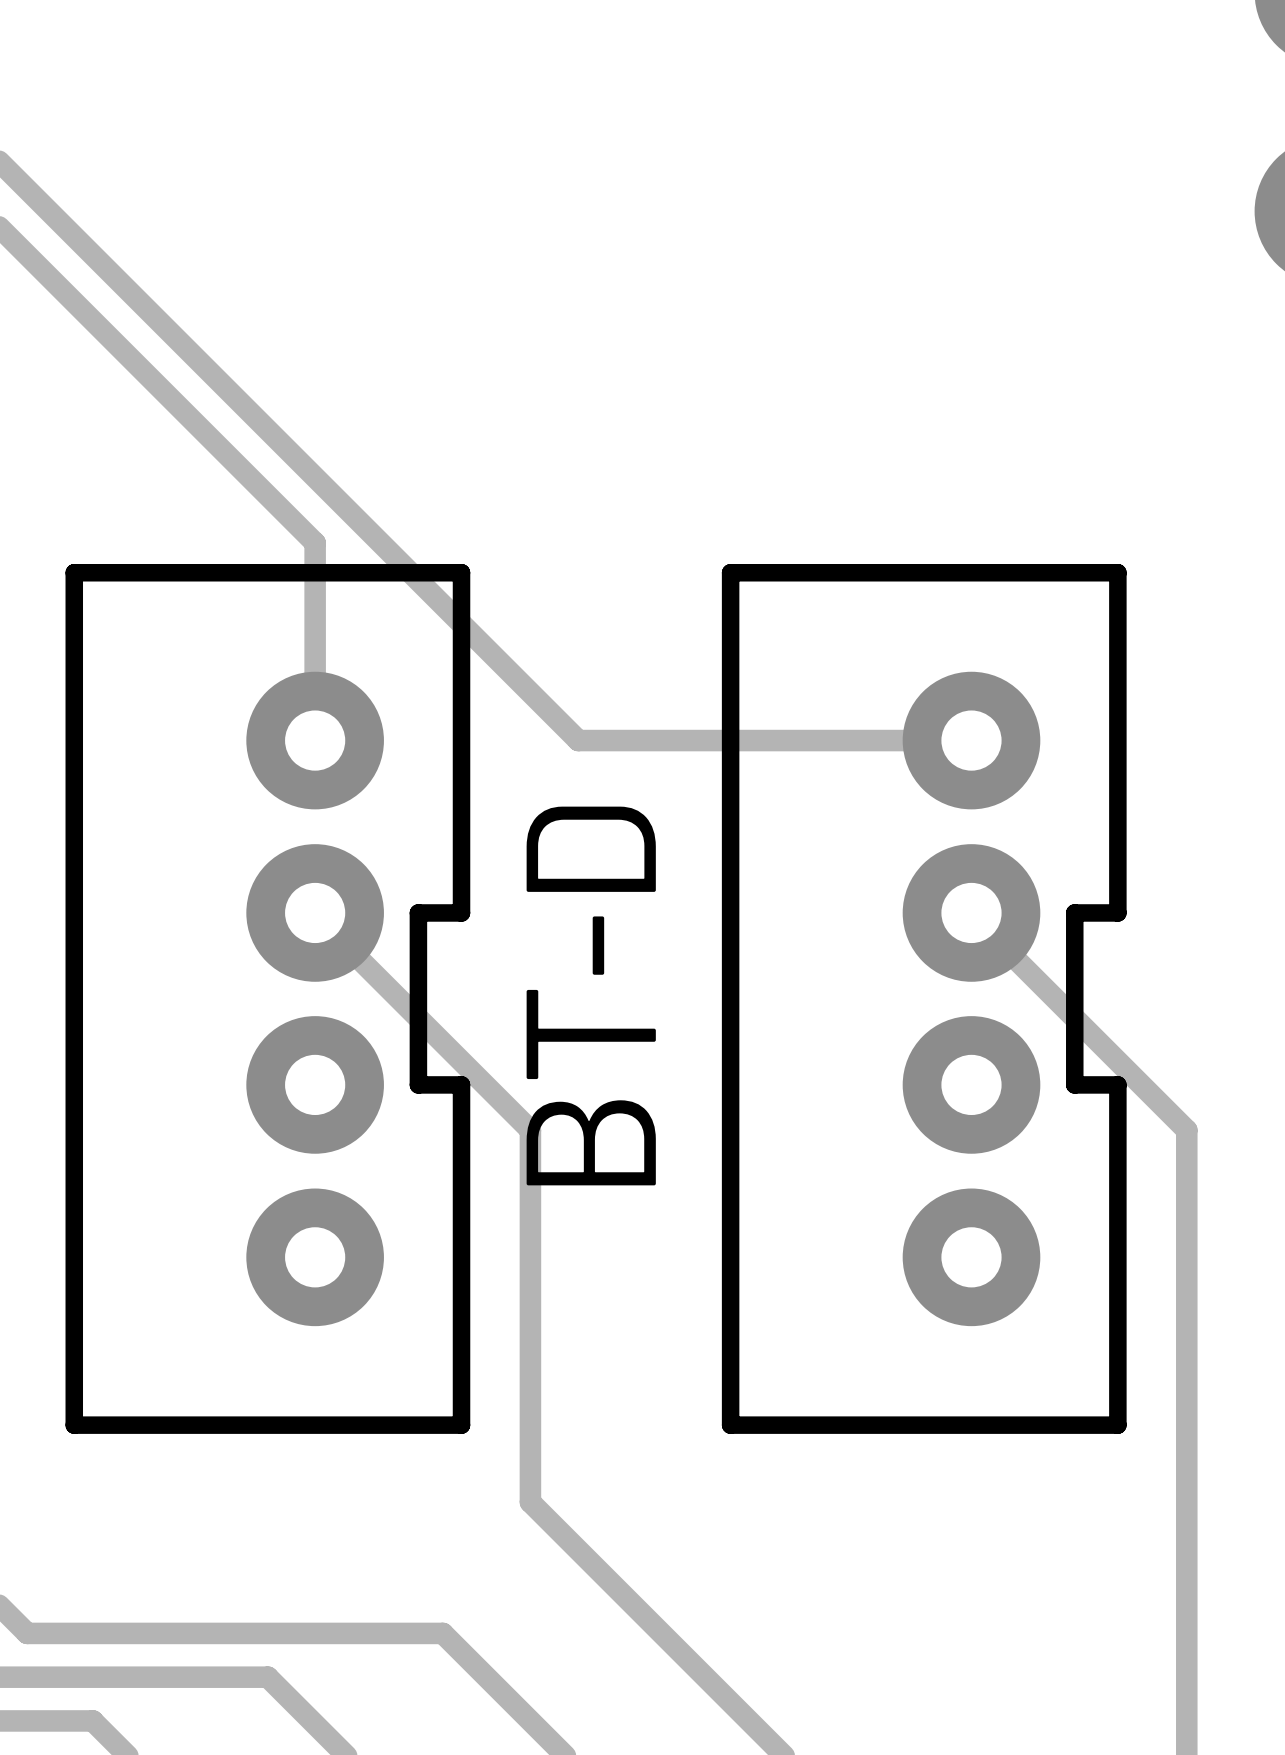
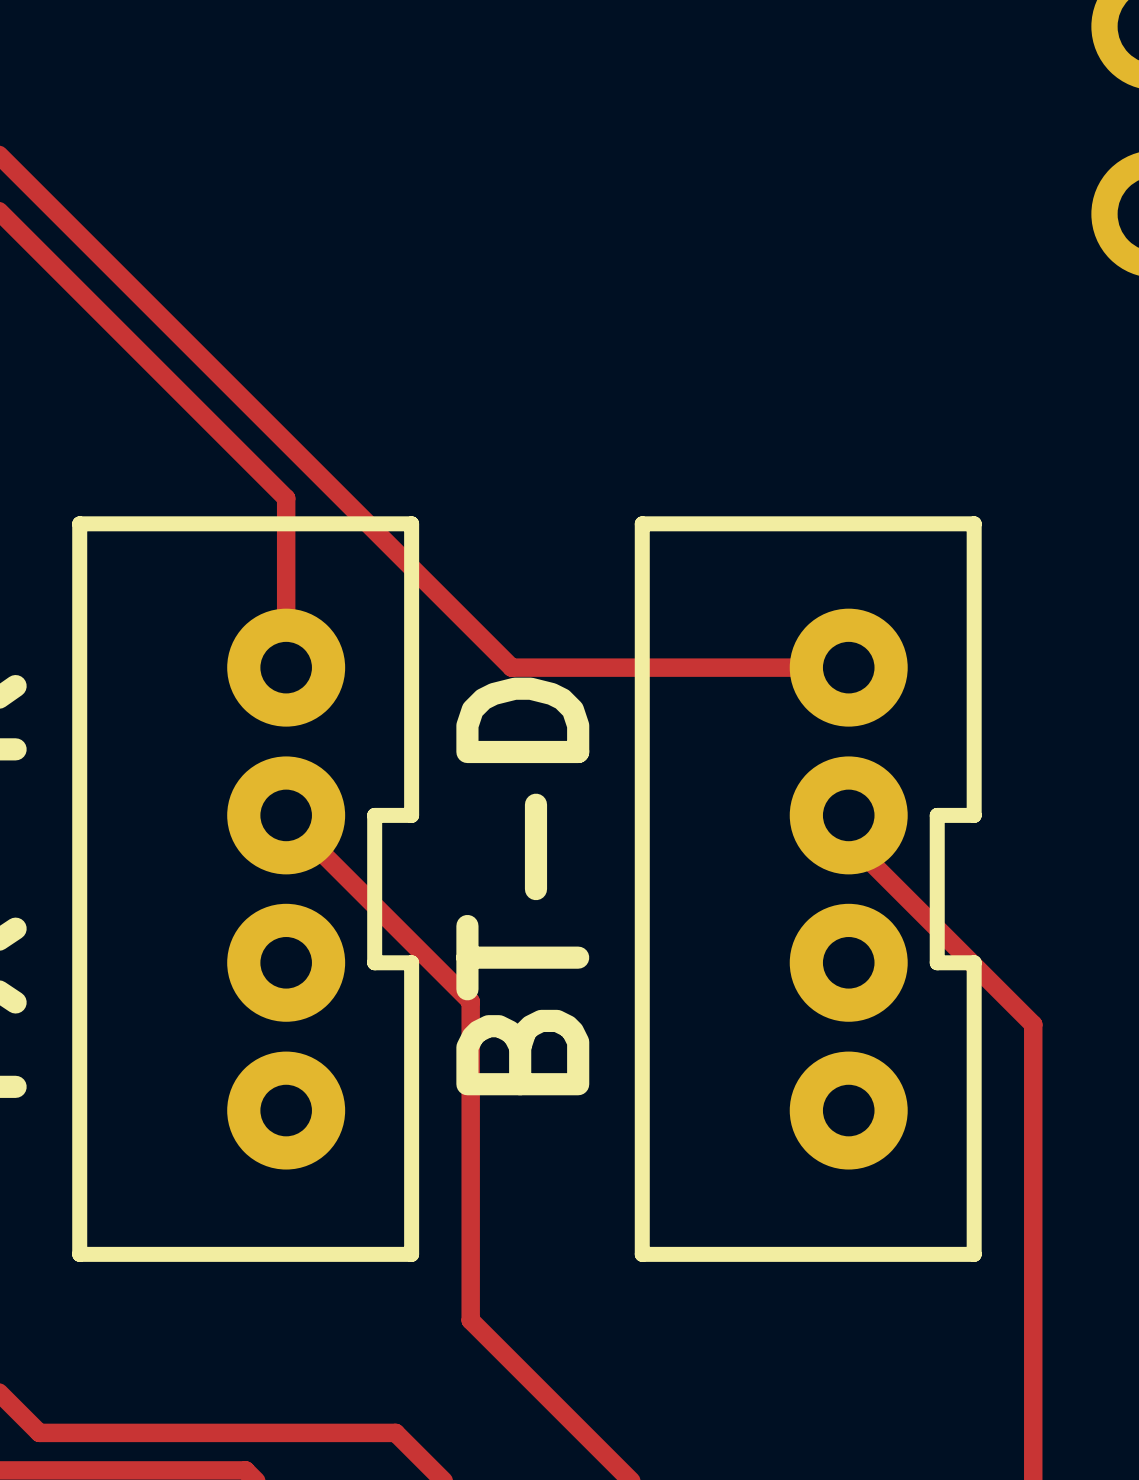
track: (971, 914) (1186, 1130) (1186, 1156) -> (848, 817) (848, 840) (1033, 1024)

